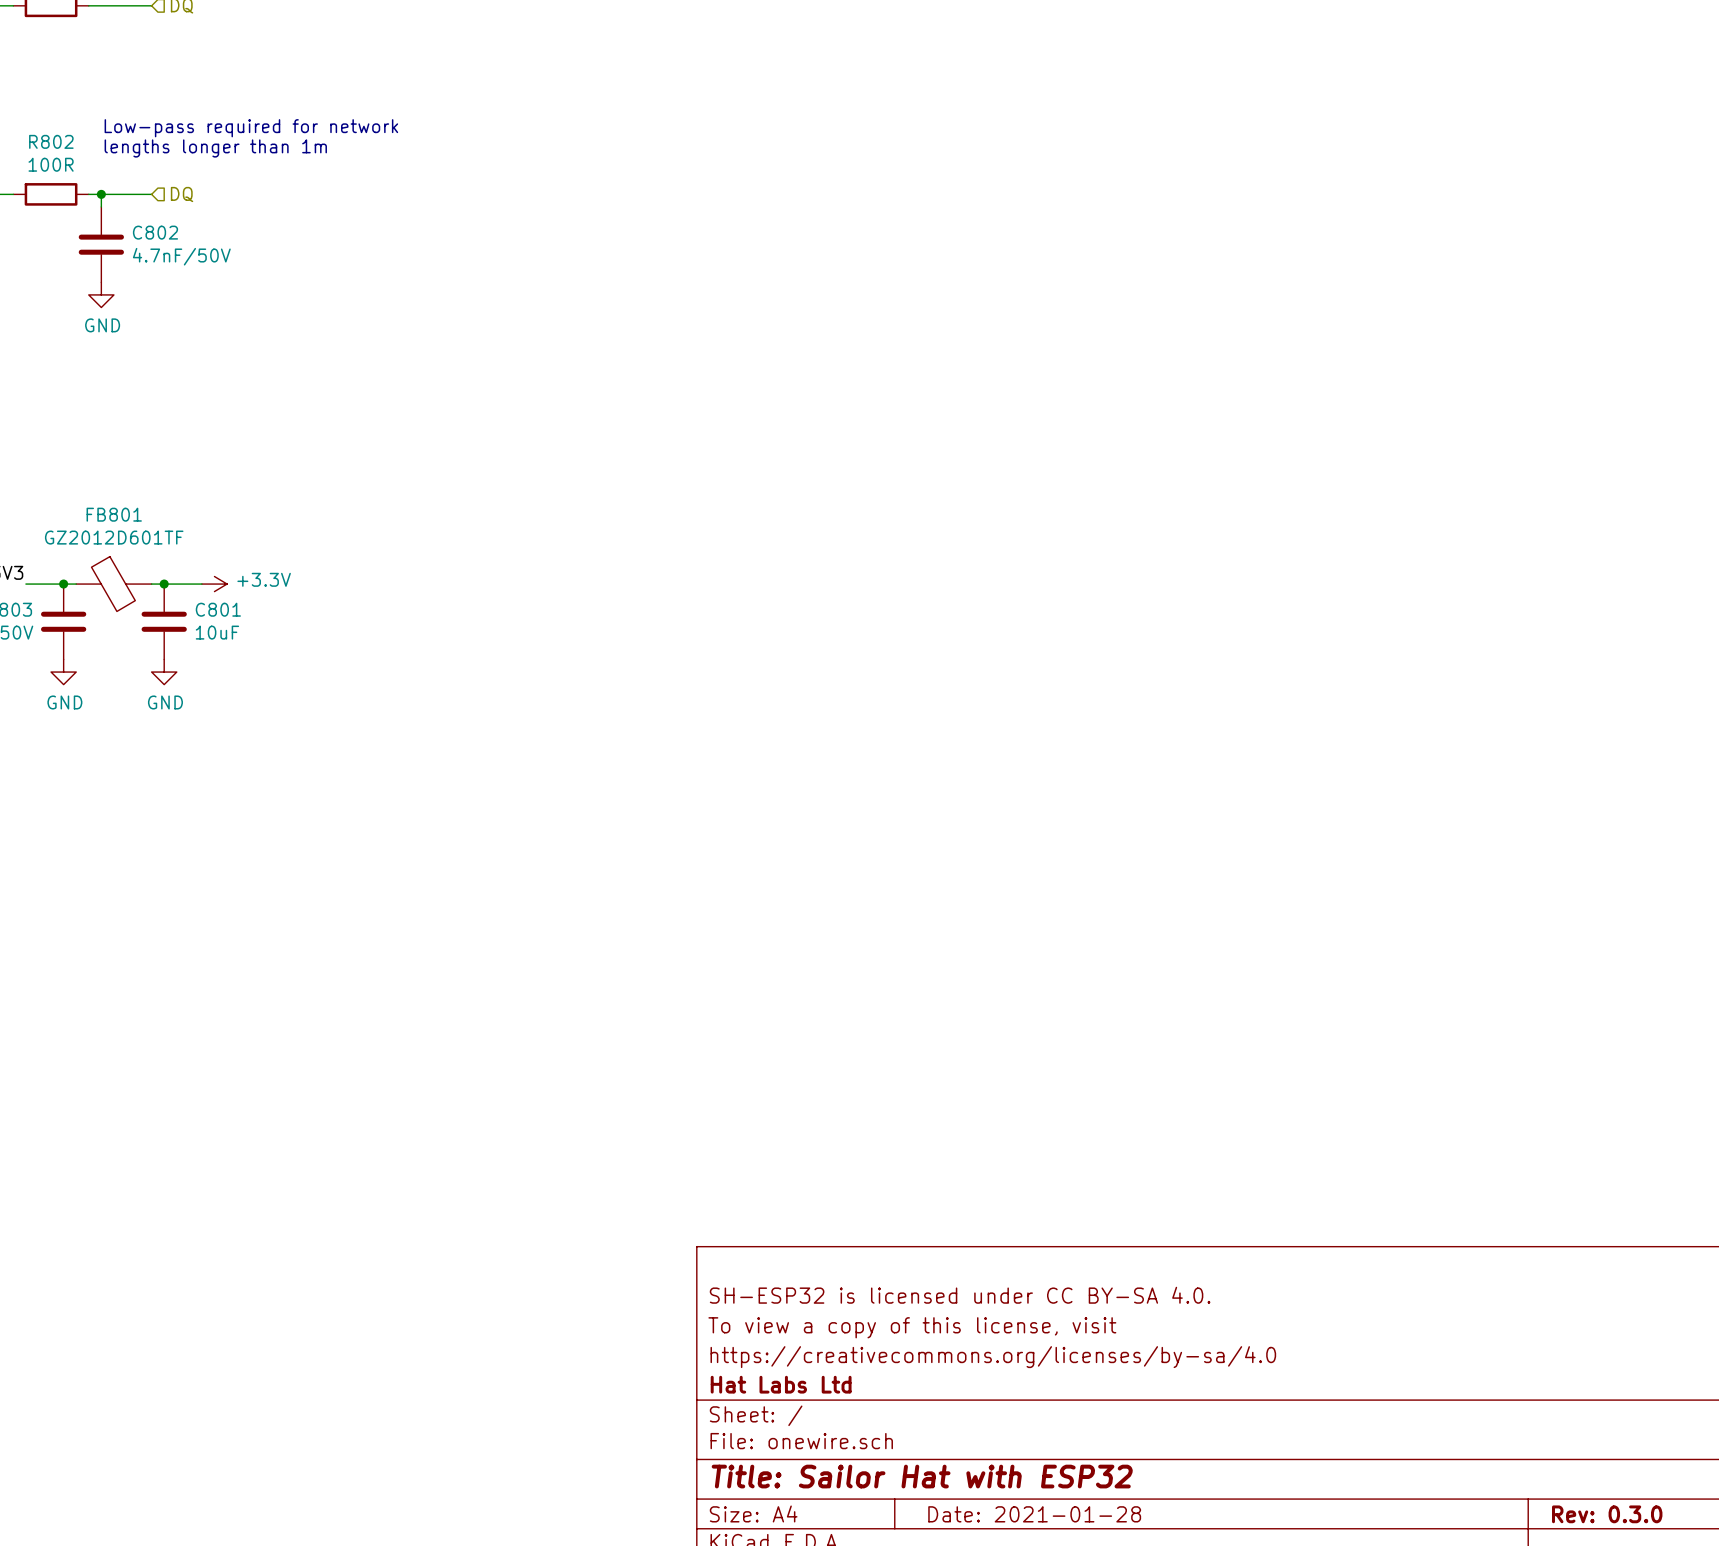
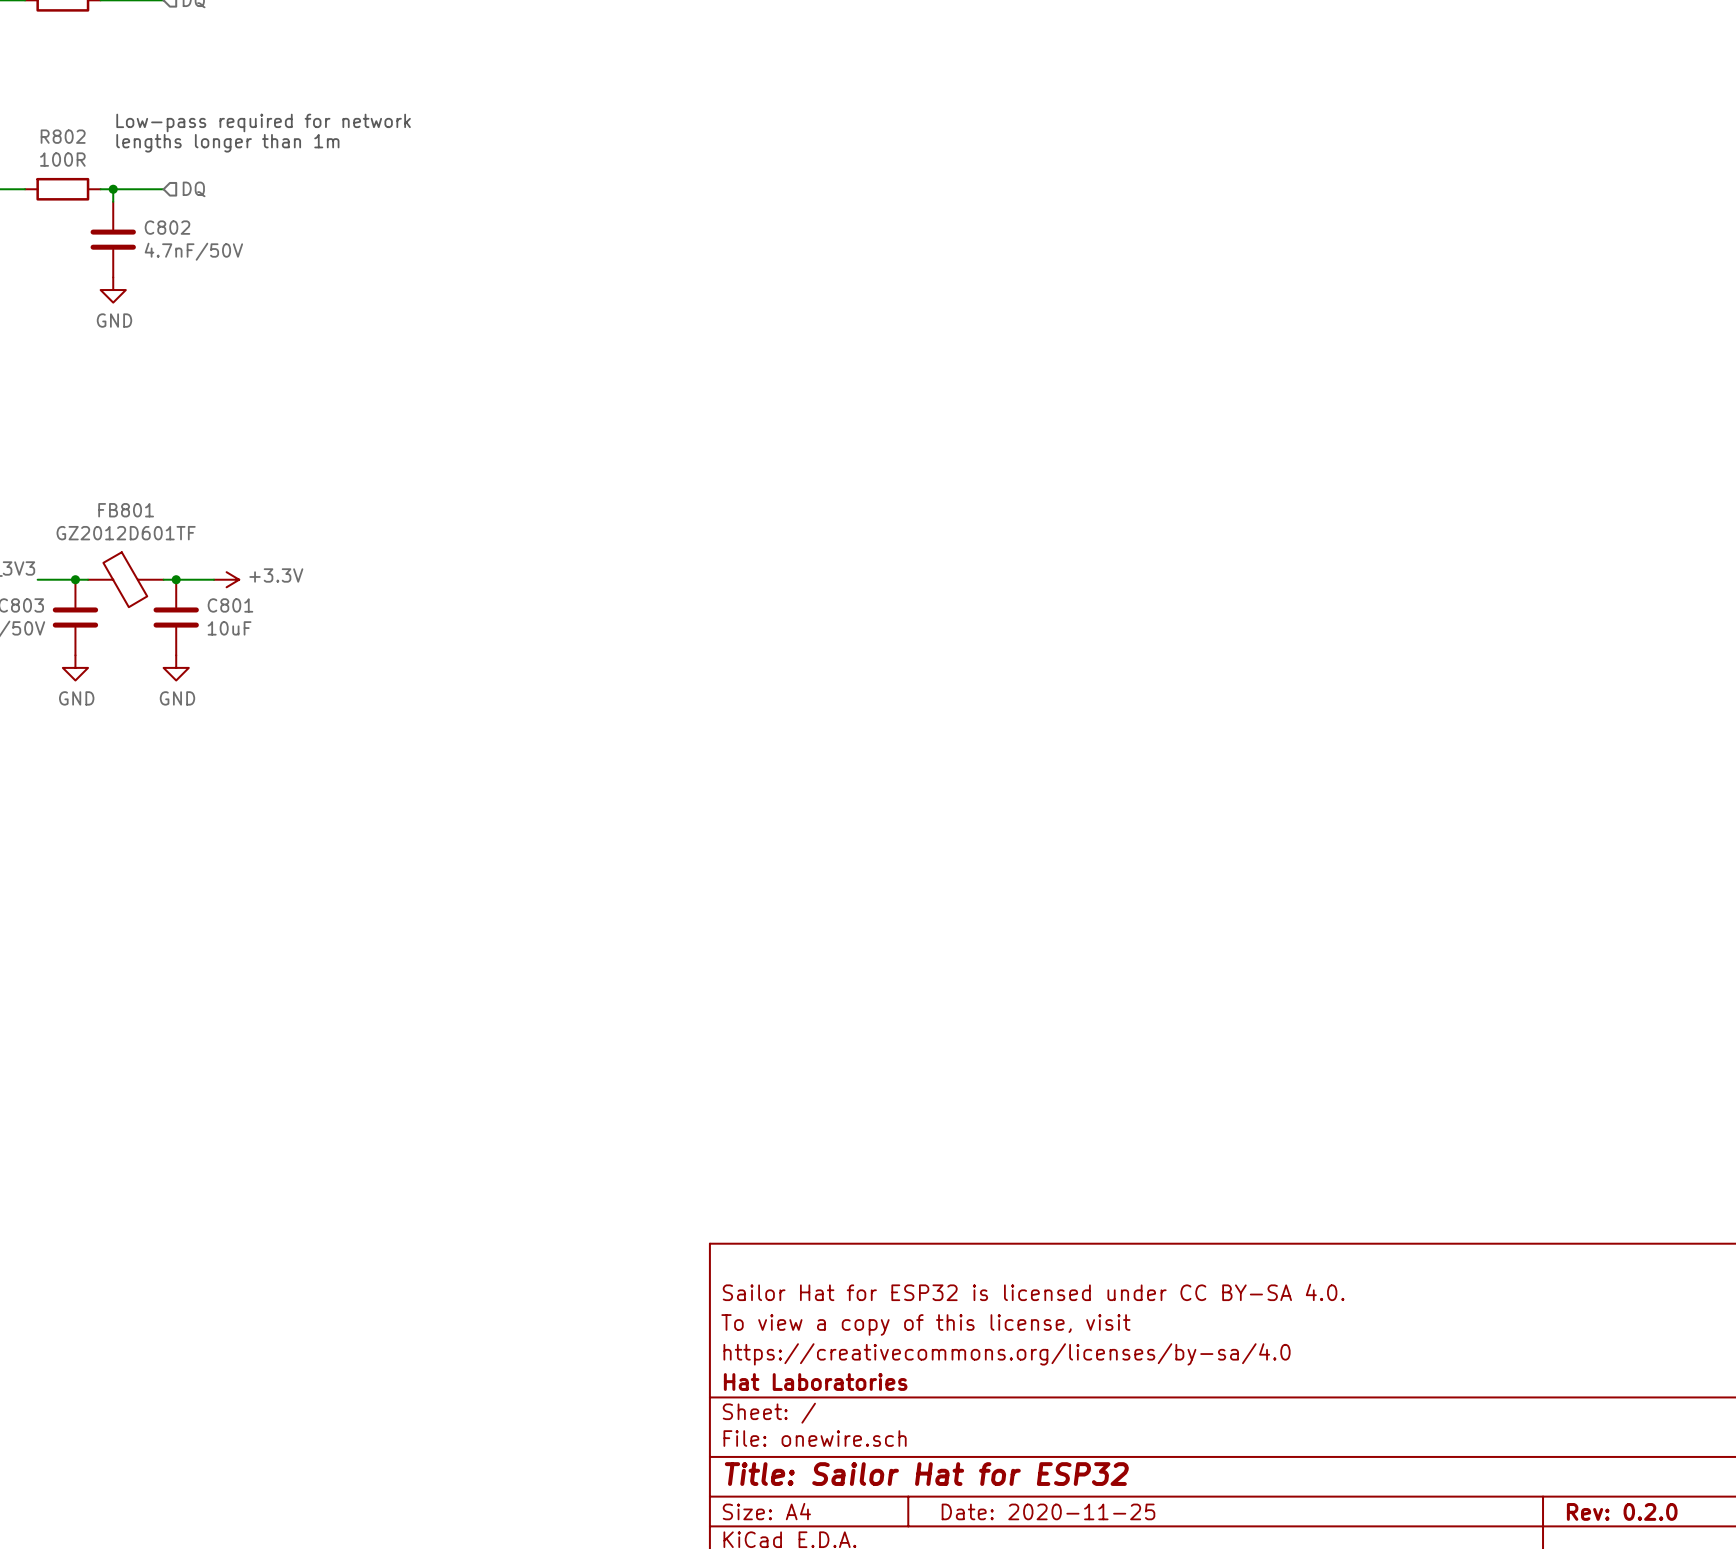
title block: SH-ESP32 is licensed under CC BY-SA 4.0. (960, 1295) -> Sailor Hat for ESP32 is licensed under CC BY-SA 4.0. (1033, 1292)
title block: Hat Labs Ltd (781, 1384) -> Hat Laboratories (815, 1382)
title block: Title: Sailor Hat with ESP32 (922, 1476) -> Title: Sailor Hat for ESP32 (926, 1474)
title block: Date: 2021-01-28 (1034, 1514) -> Date: 2020-11-25 (1048, 1511)
title block: Rev: 0.3.0 (1607, 1514) -> Rev: 0.2.0 (1622, 1511)

